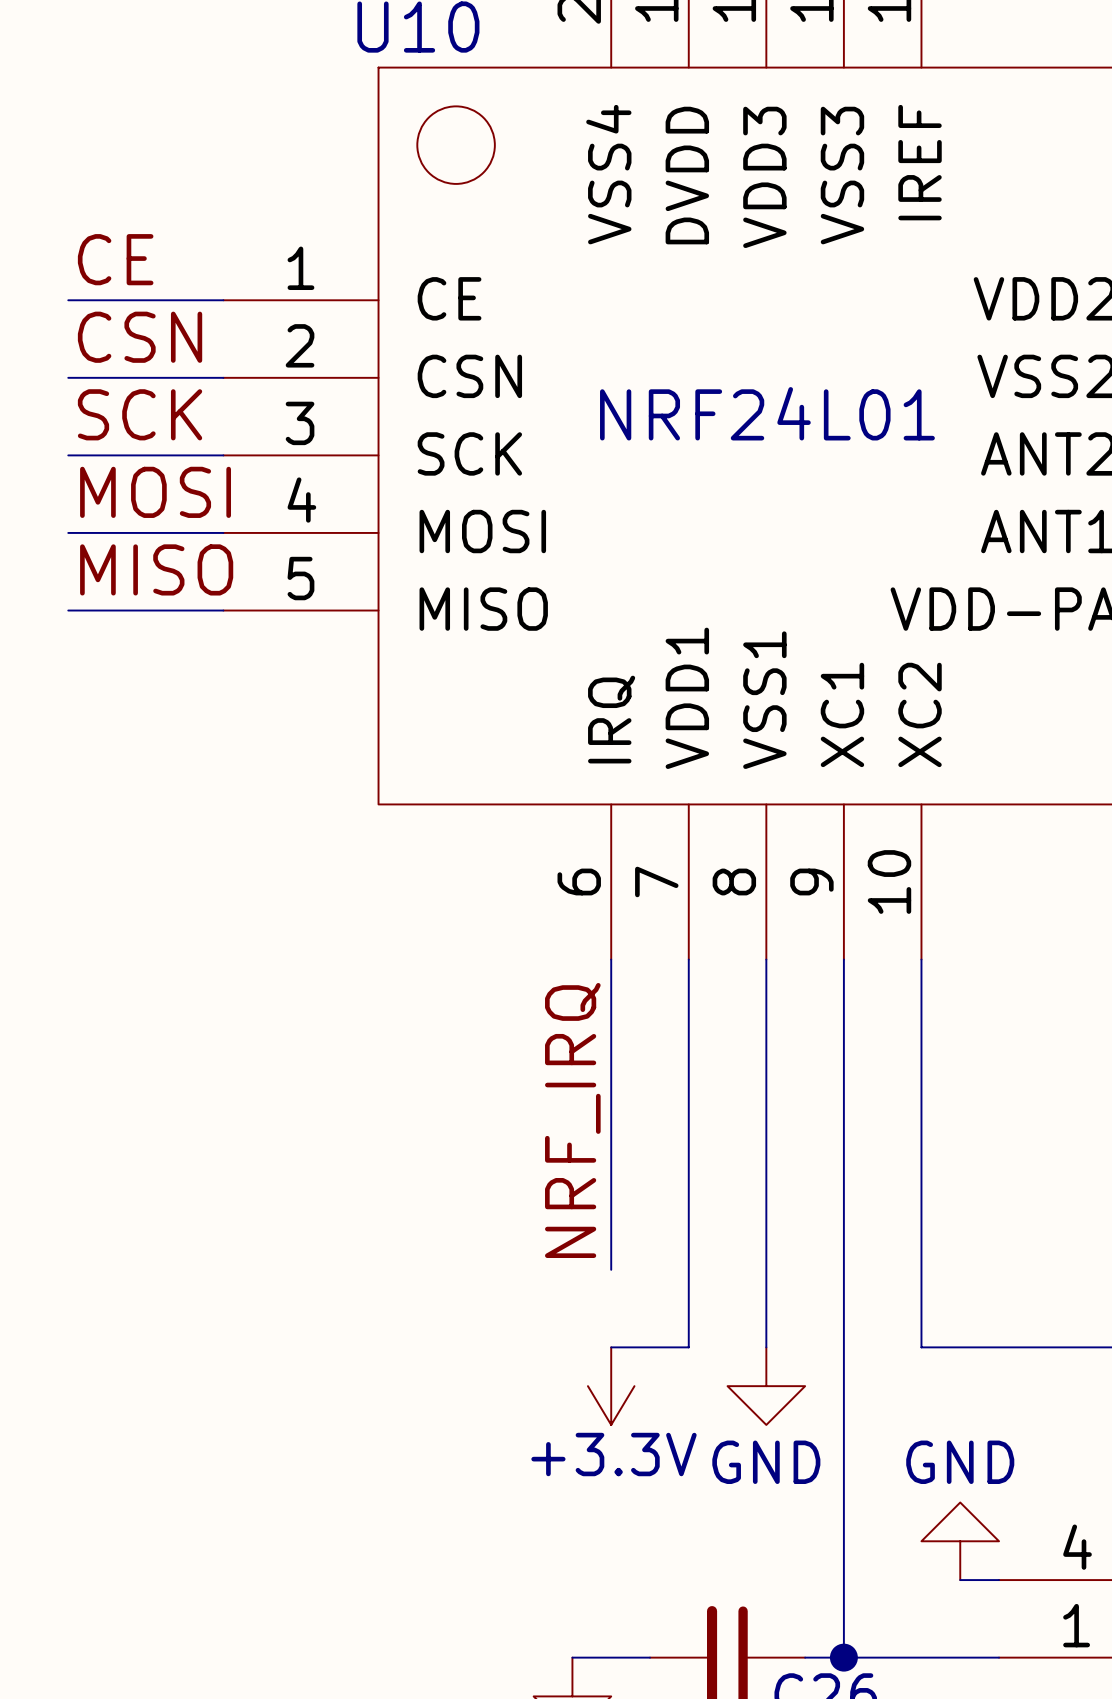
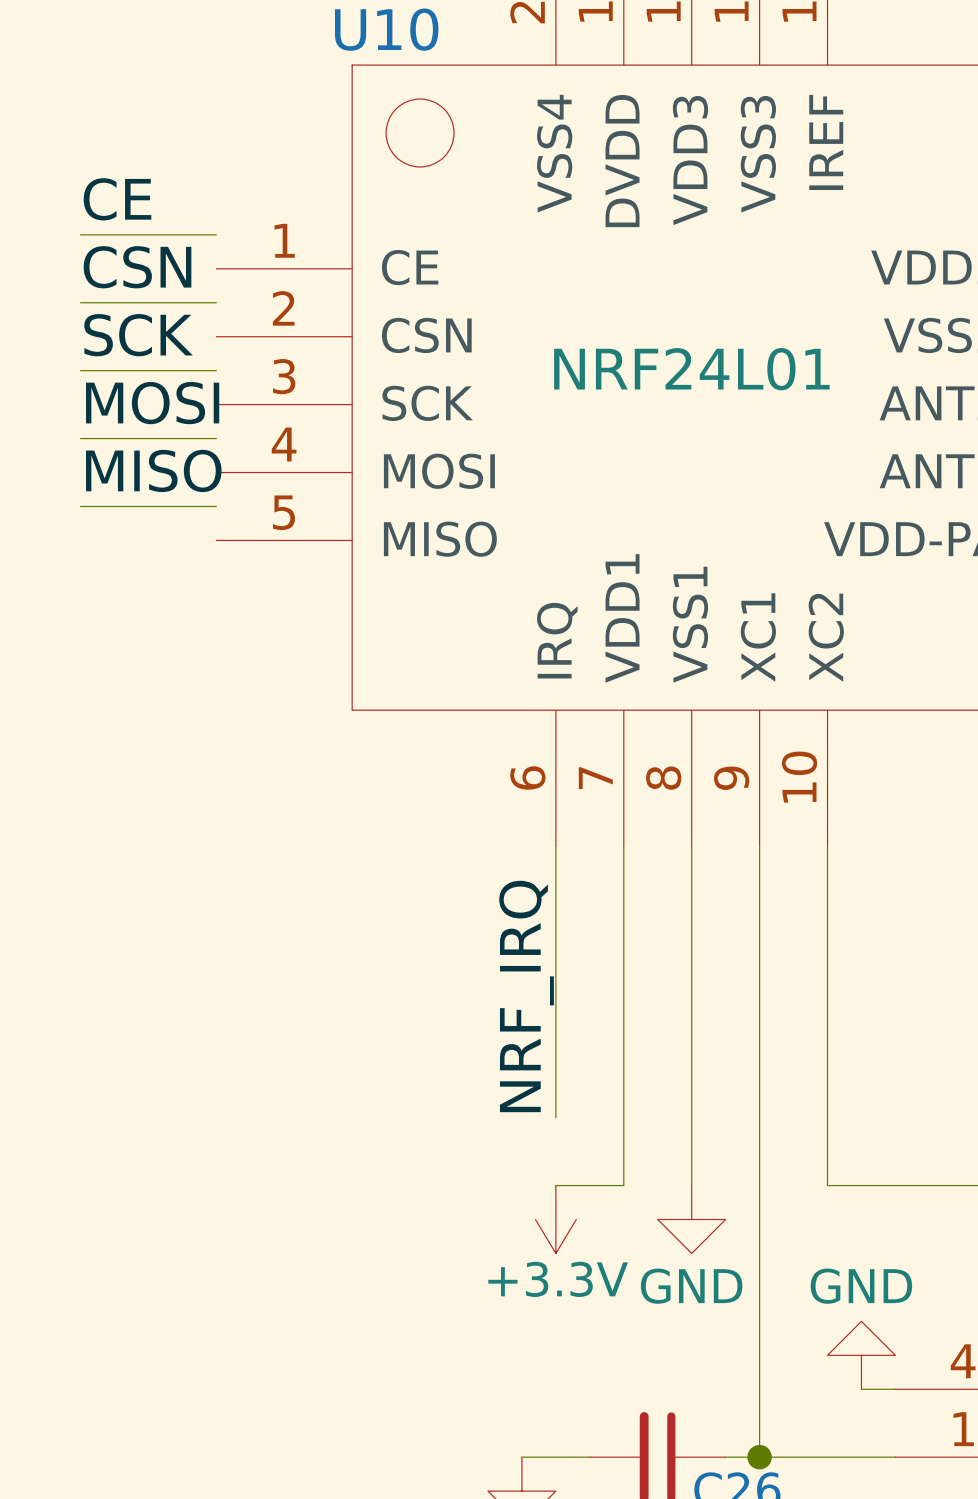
label position: CE (115, 259) -> CE (117, 199)
wire: (68, 300) (223, 300) -> (80, 234) (216, 234)
label position: CSN (140, 337) -> CSN (137, 267)
wire: (68, 377) (223, 377) -> (80, 302) (216, 302)
label position: SCK (140, 414) -> SCK (138, 335)
wire: (68, 455) (223, 455) -> (80, 370) (216, 370)
label position: MOSI (155, 492) -> MOSI (152, 403)
wire: (68, 532) (223, 532) -> (80, 438) (216, 438)
label position: MISO (156, 569) -> MISO (153, 470)
wire: (68, 610) (223, 610) -> (80, 506) (216, 506)

